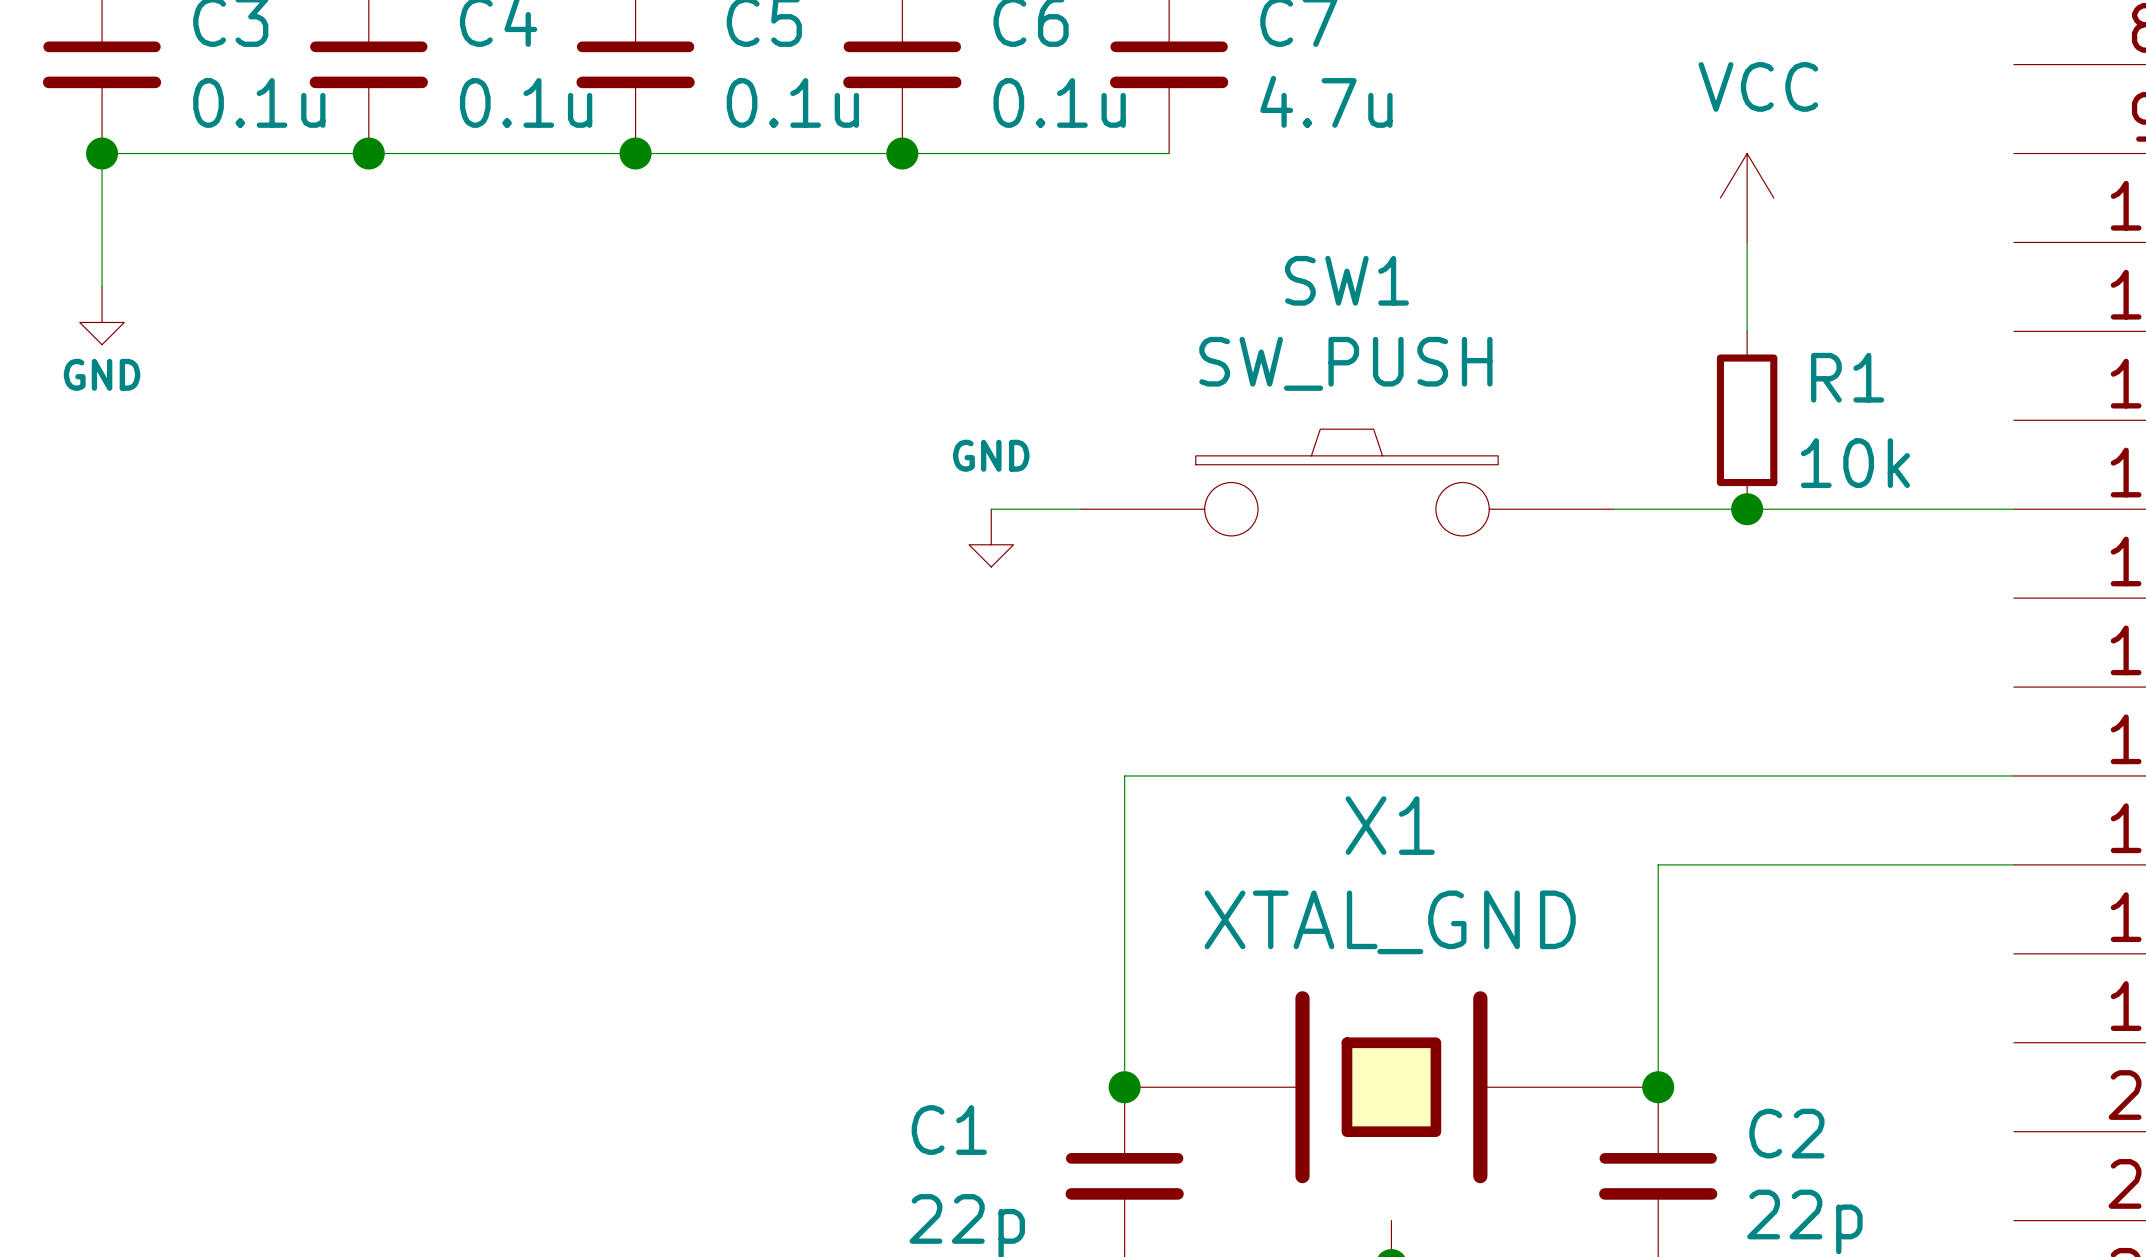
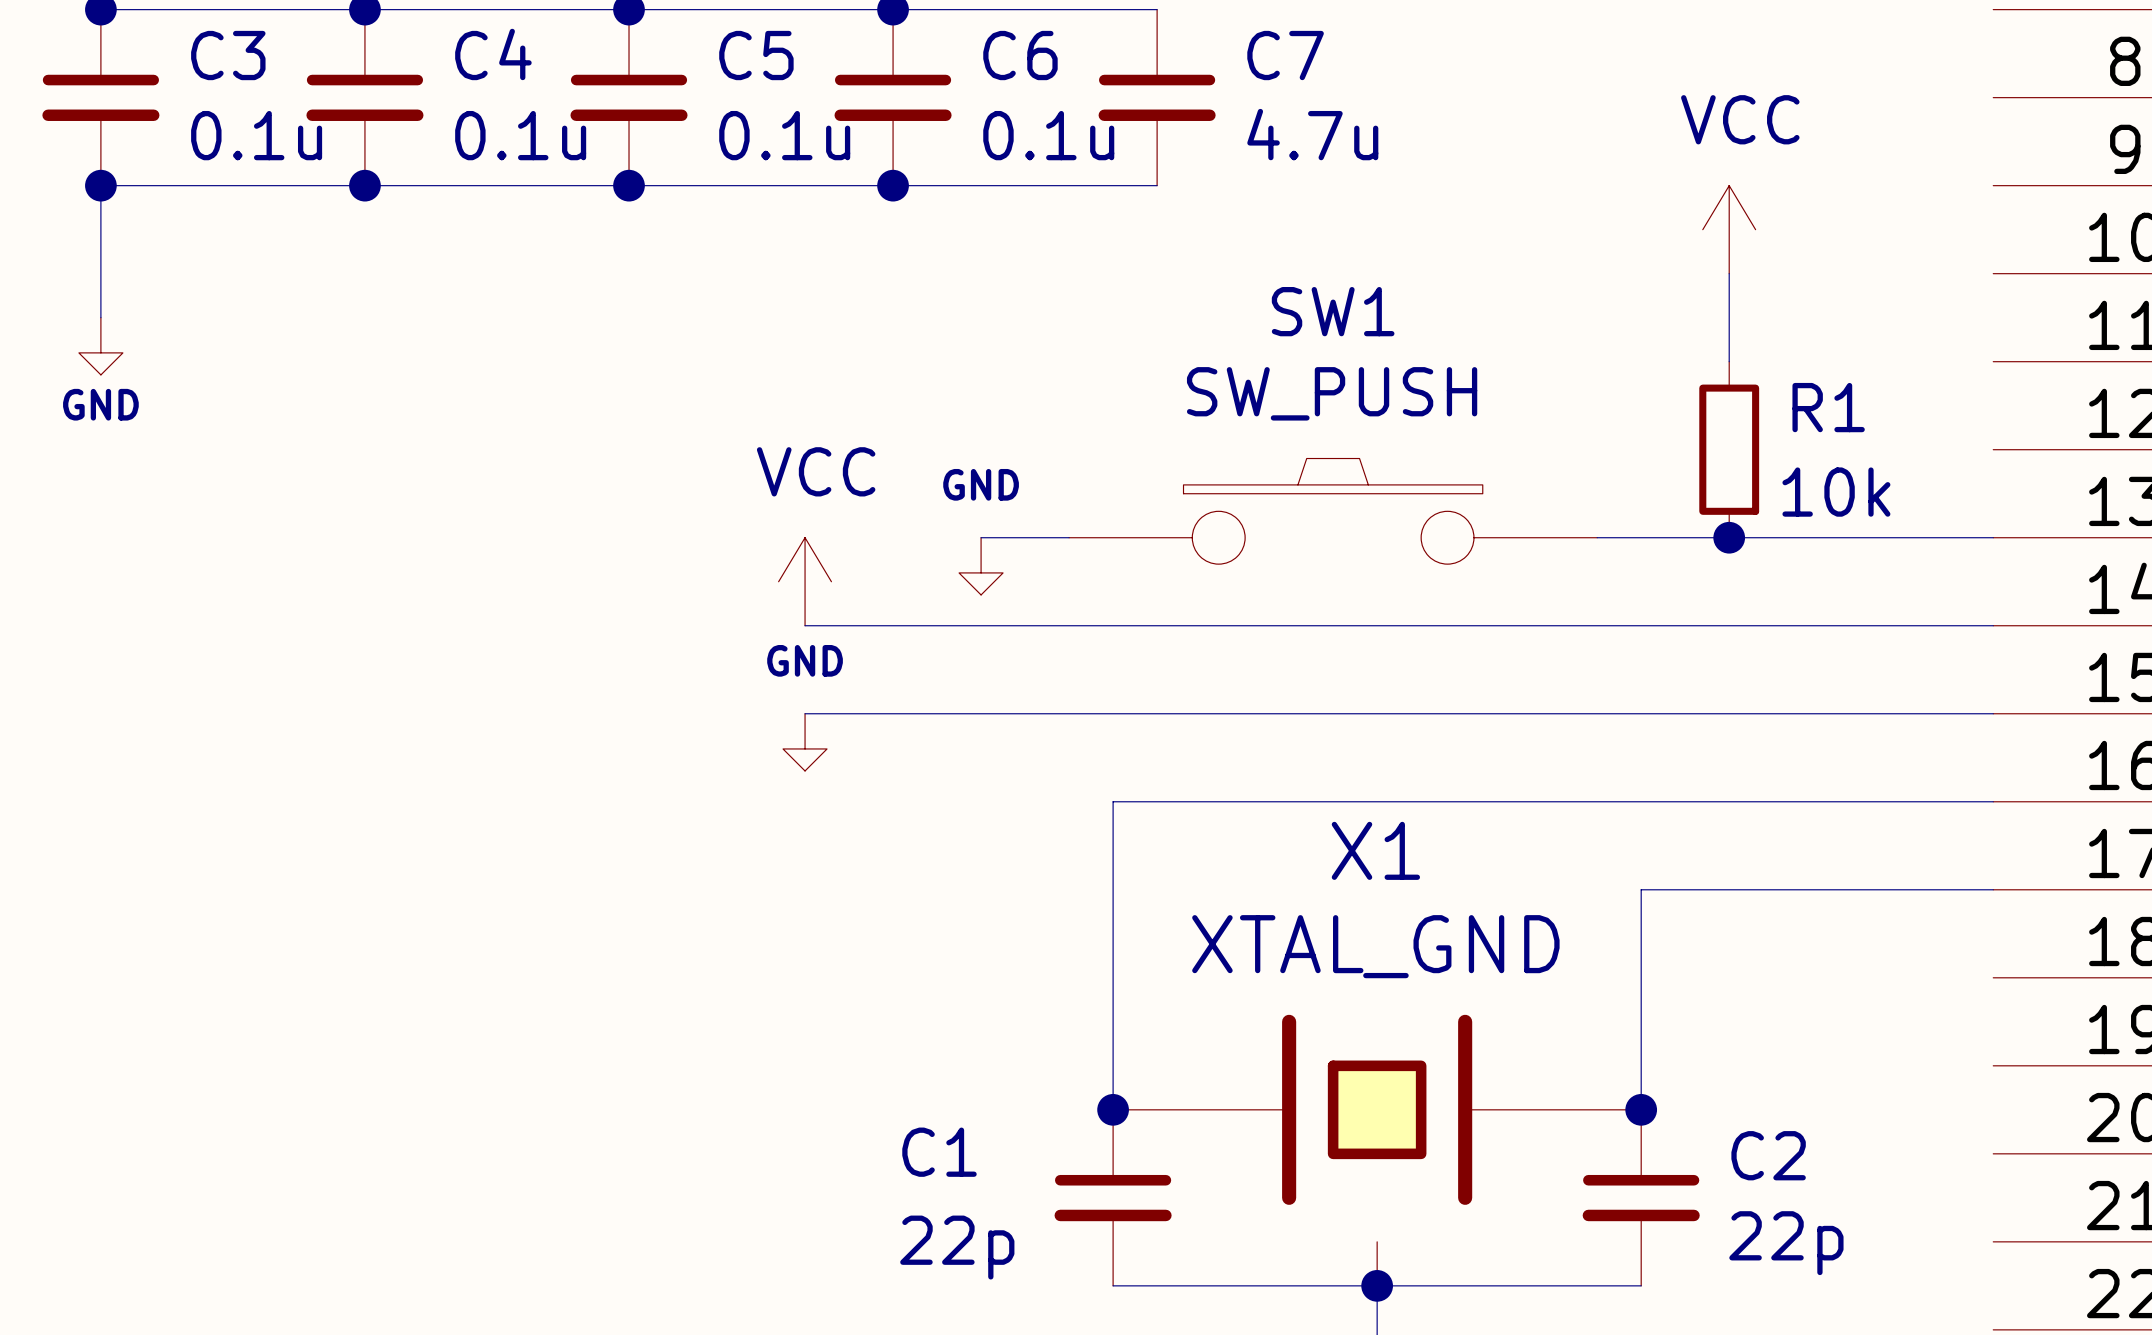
power symbol: none -> VCC (805, 581)
wire: none -> (805, 625) (1993, 625)
wire: none -> (805, 713) (1993, 713)
power symbol: none -> GND (805, 742)

